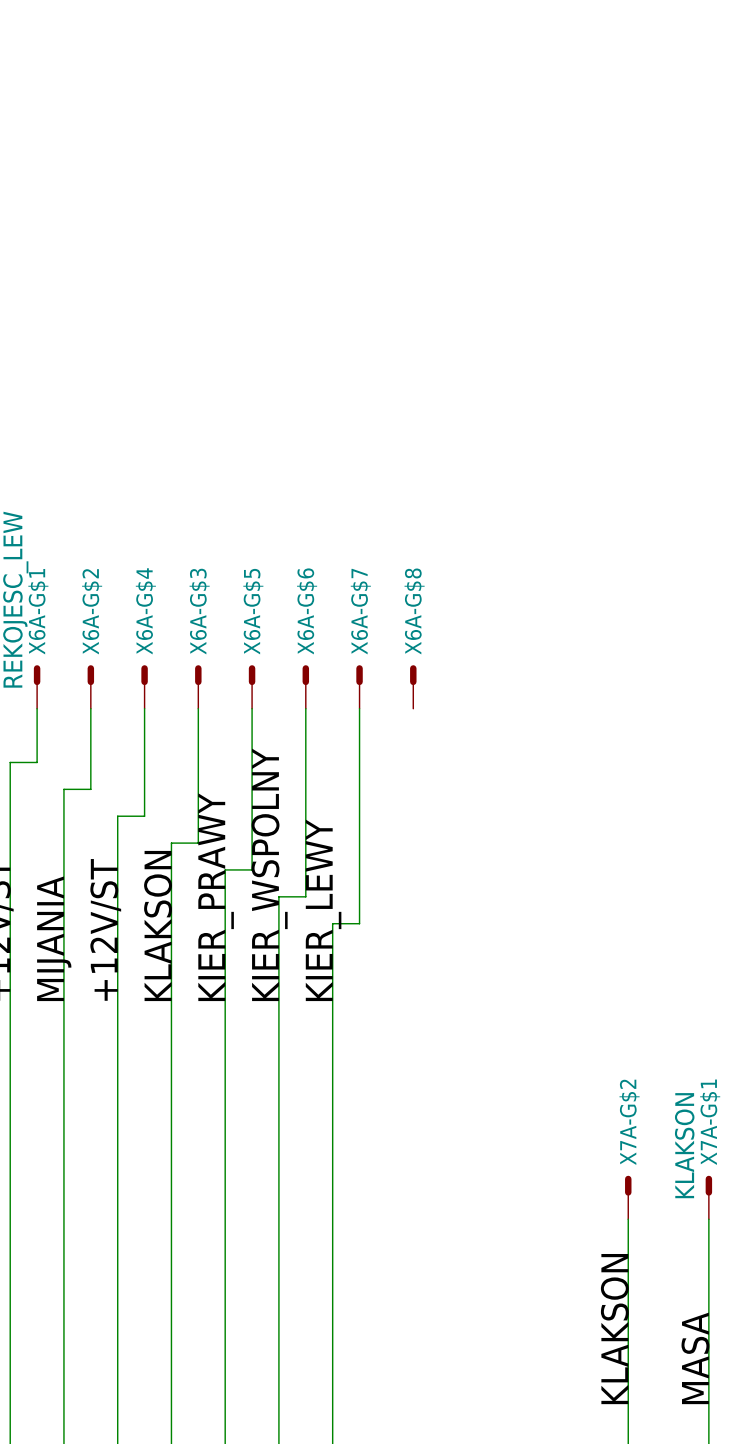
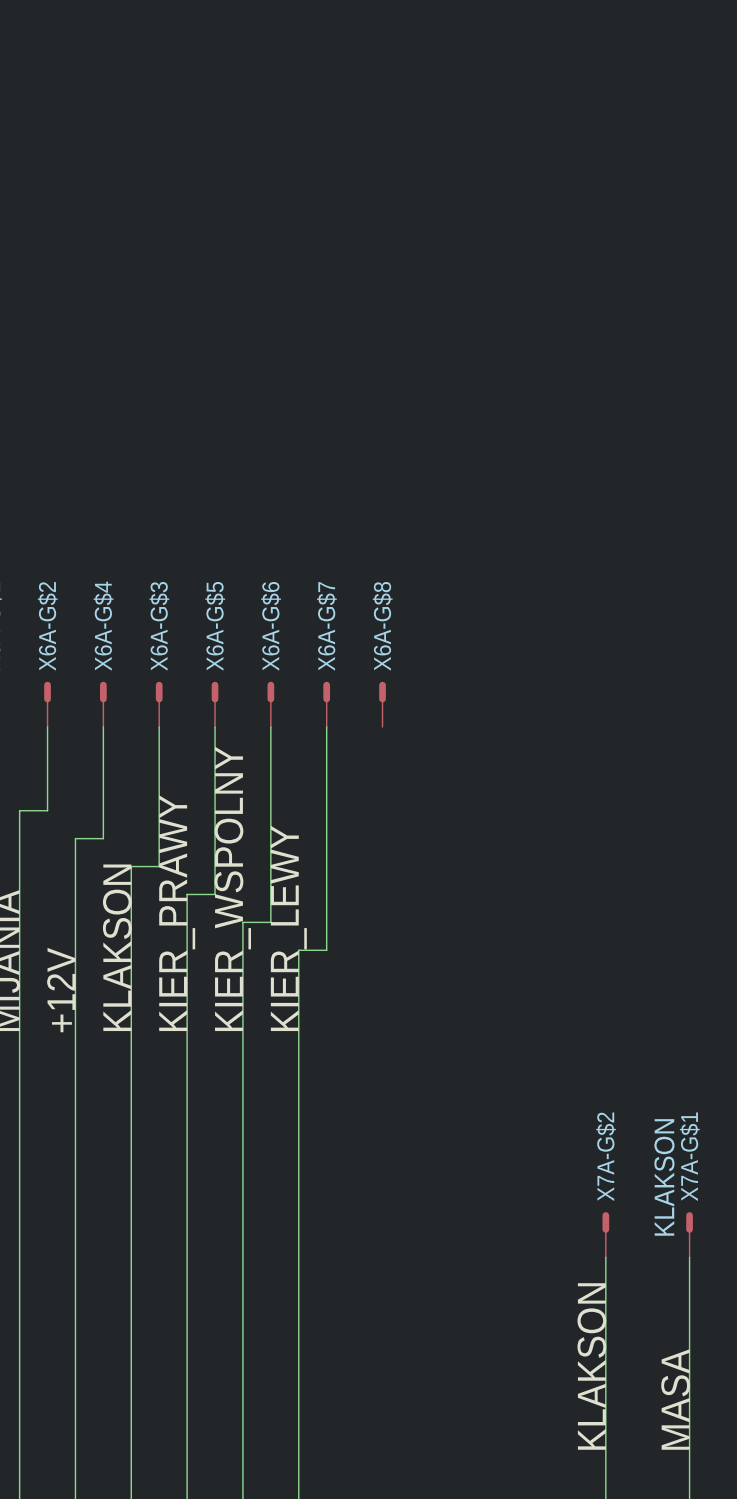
label: +12V/ST (105, 929) -> +12V (61, 990)

